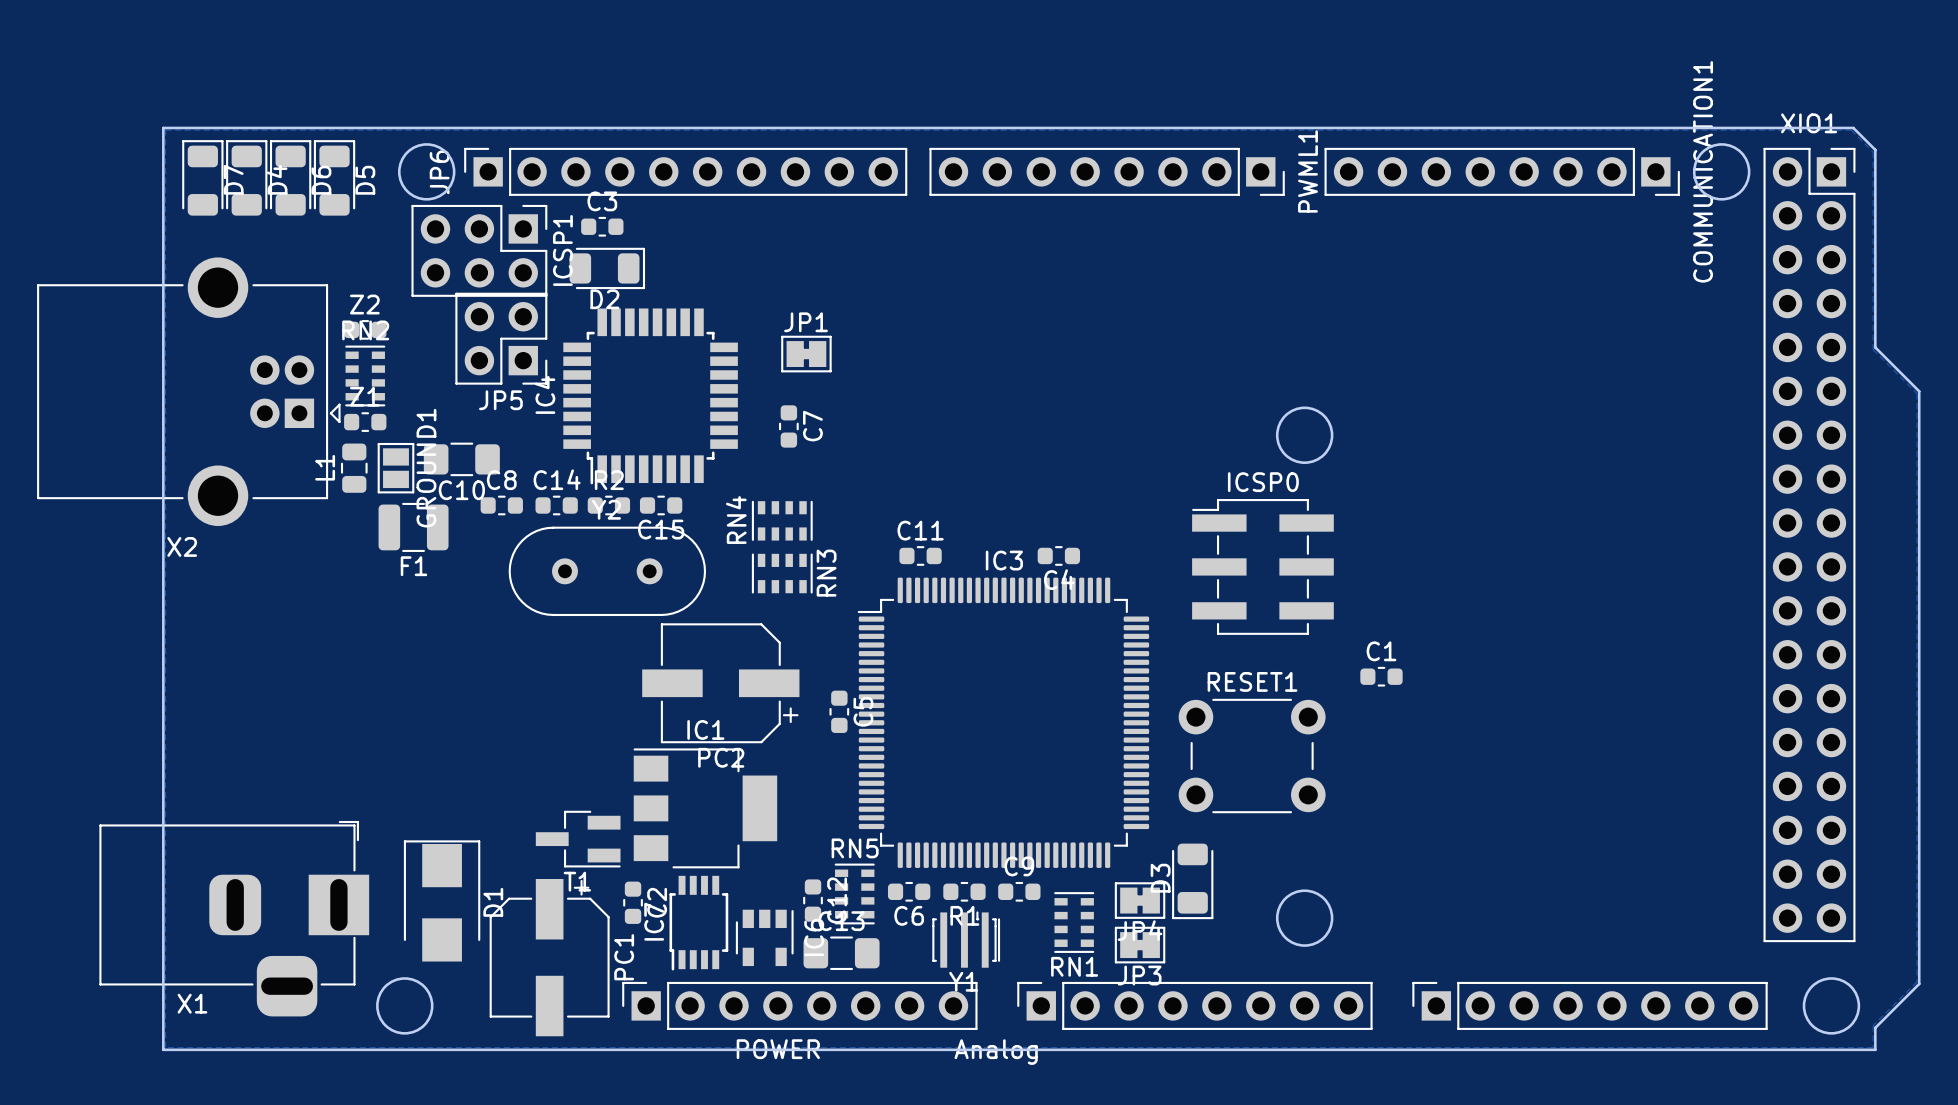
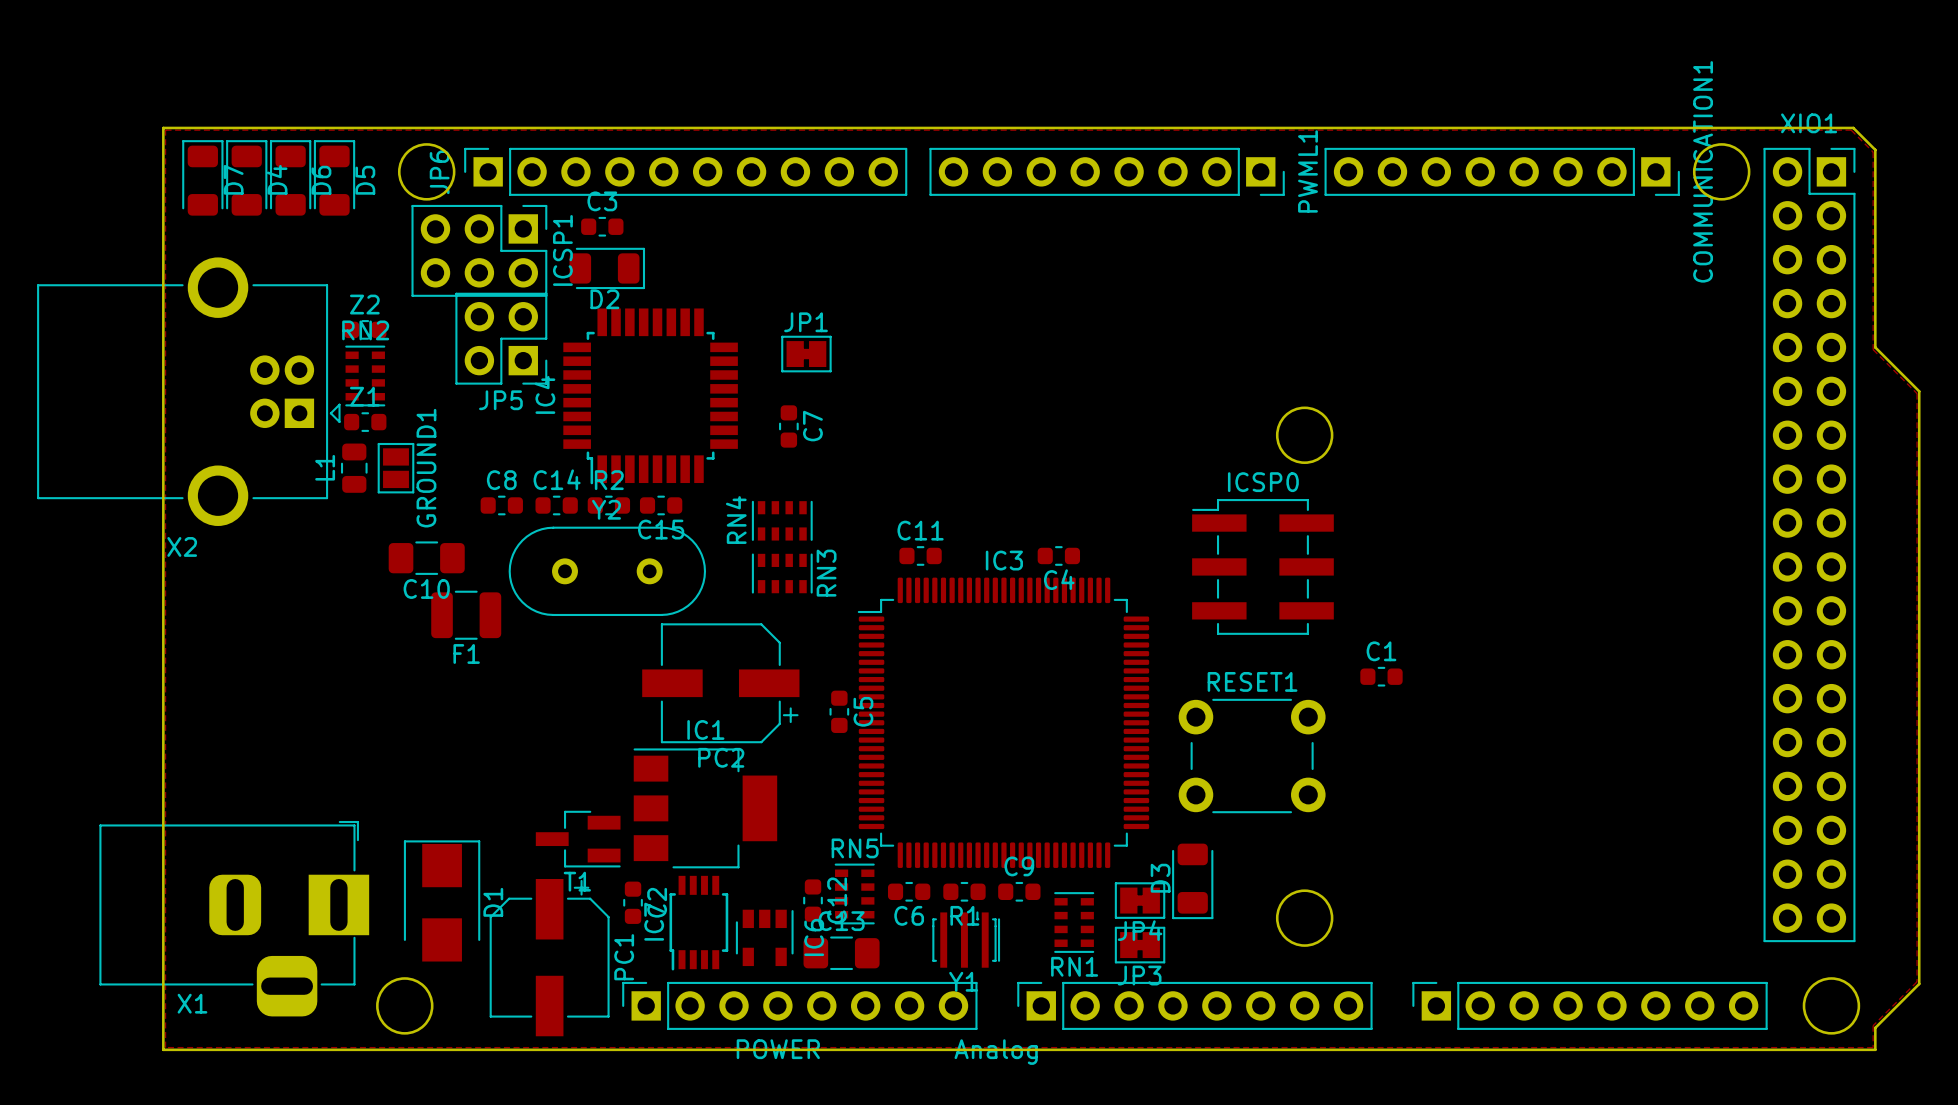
C10 position: (461, 459) -> (426, 558)
F1 position: (413, 527) -> (466, 615)

